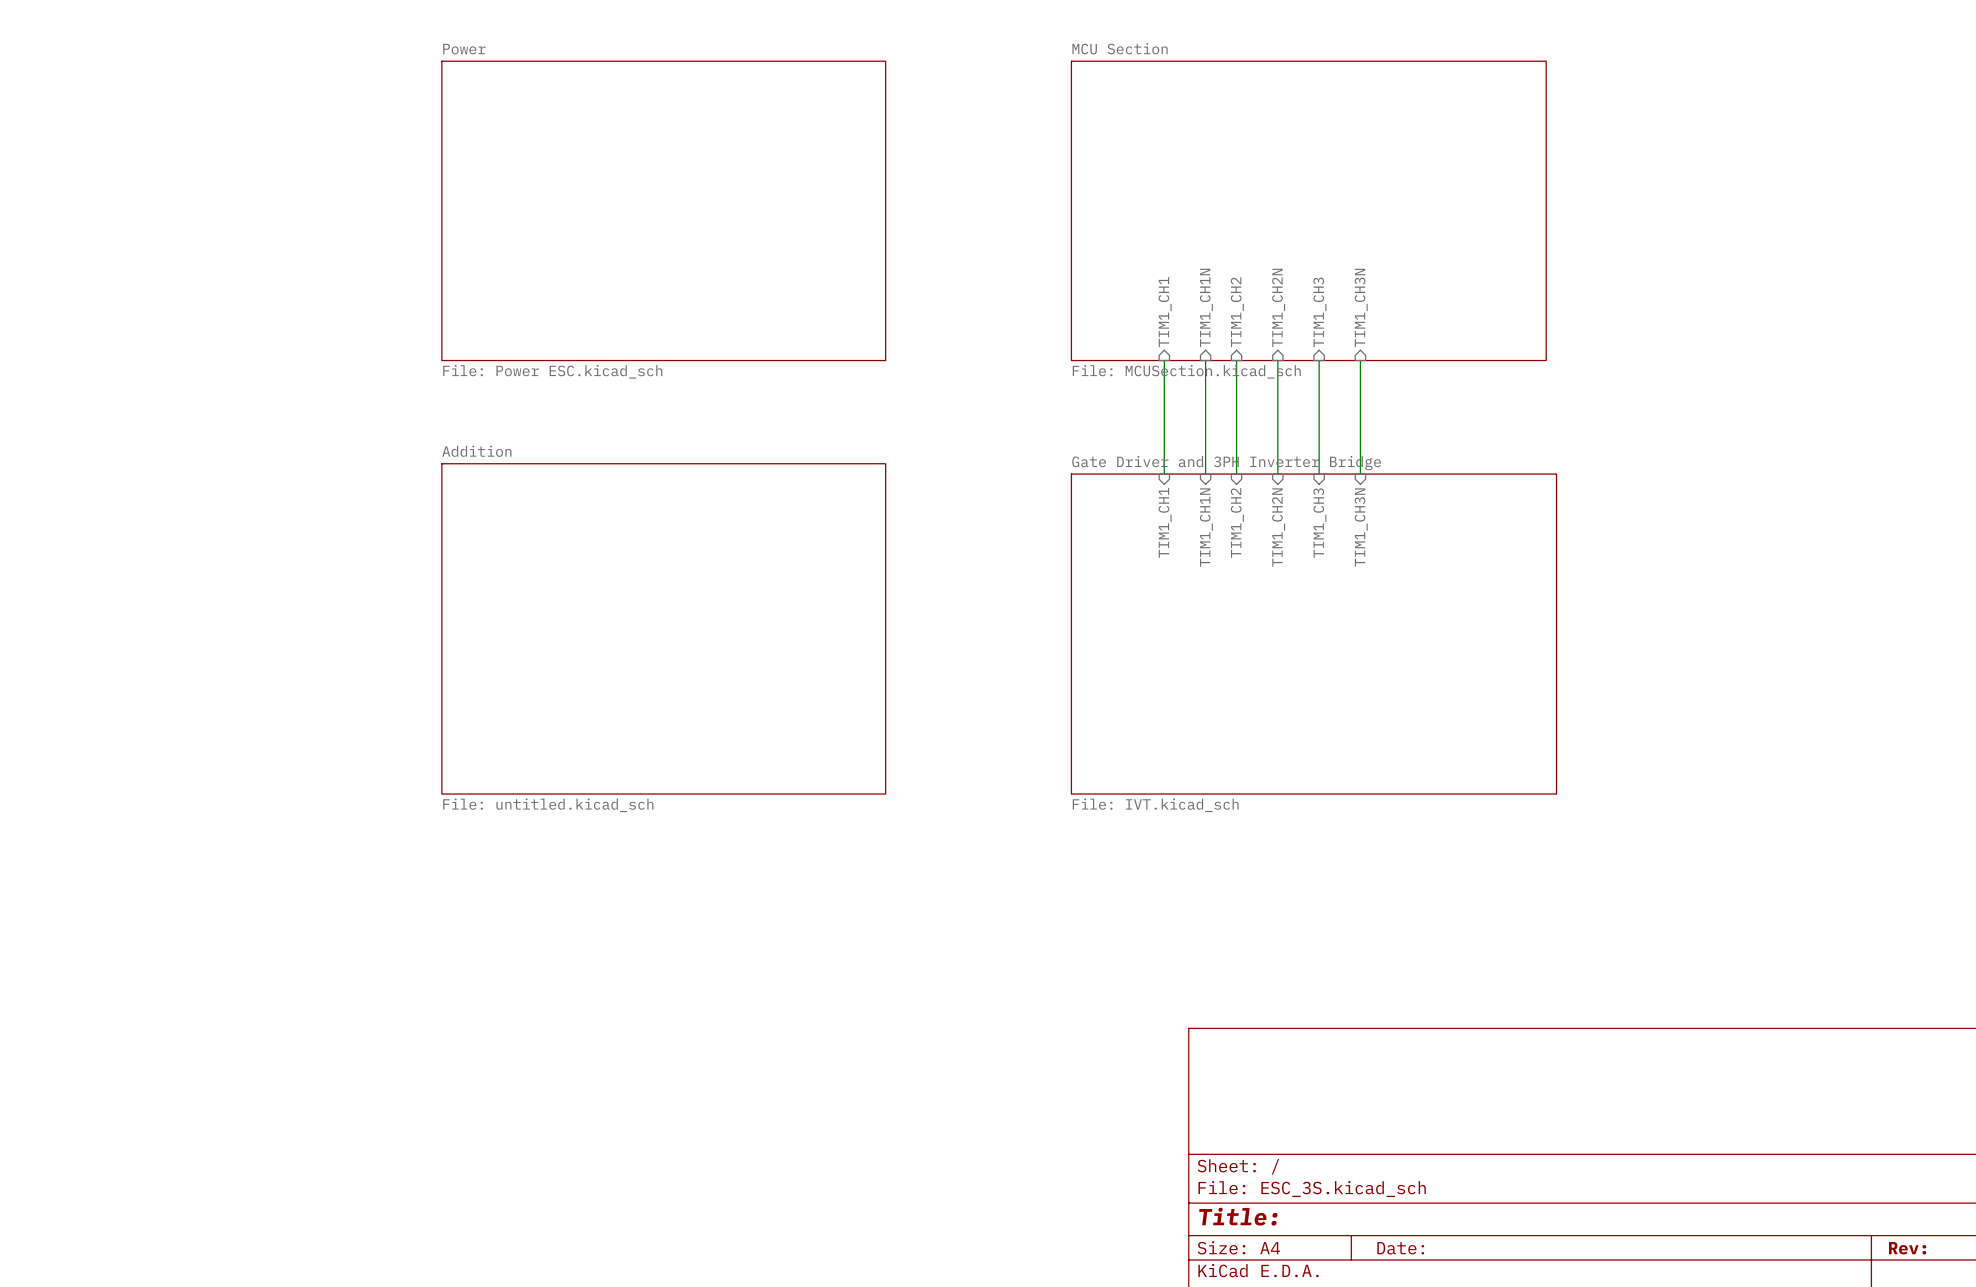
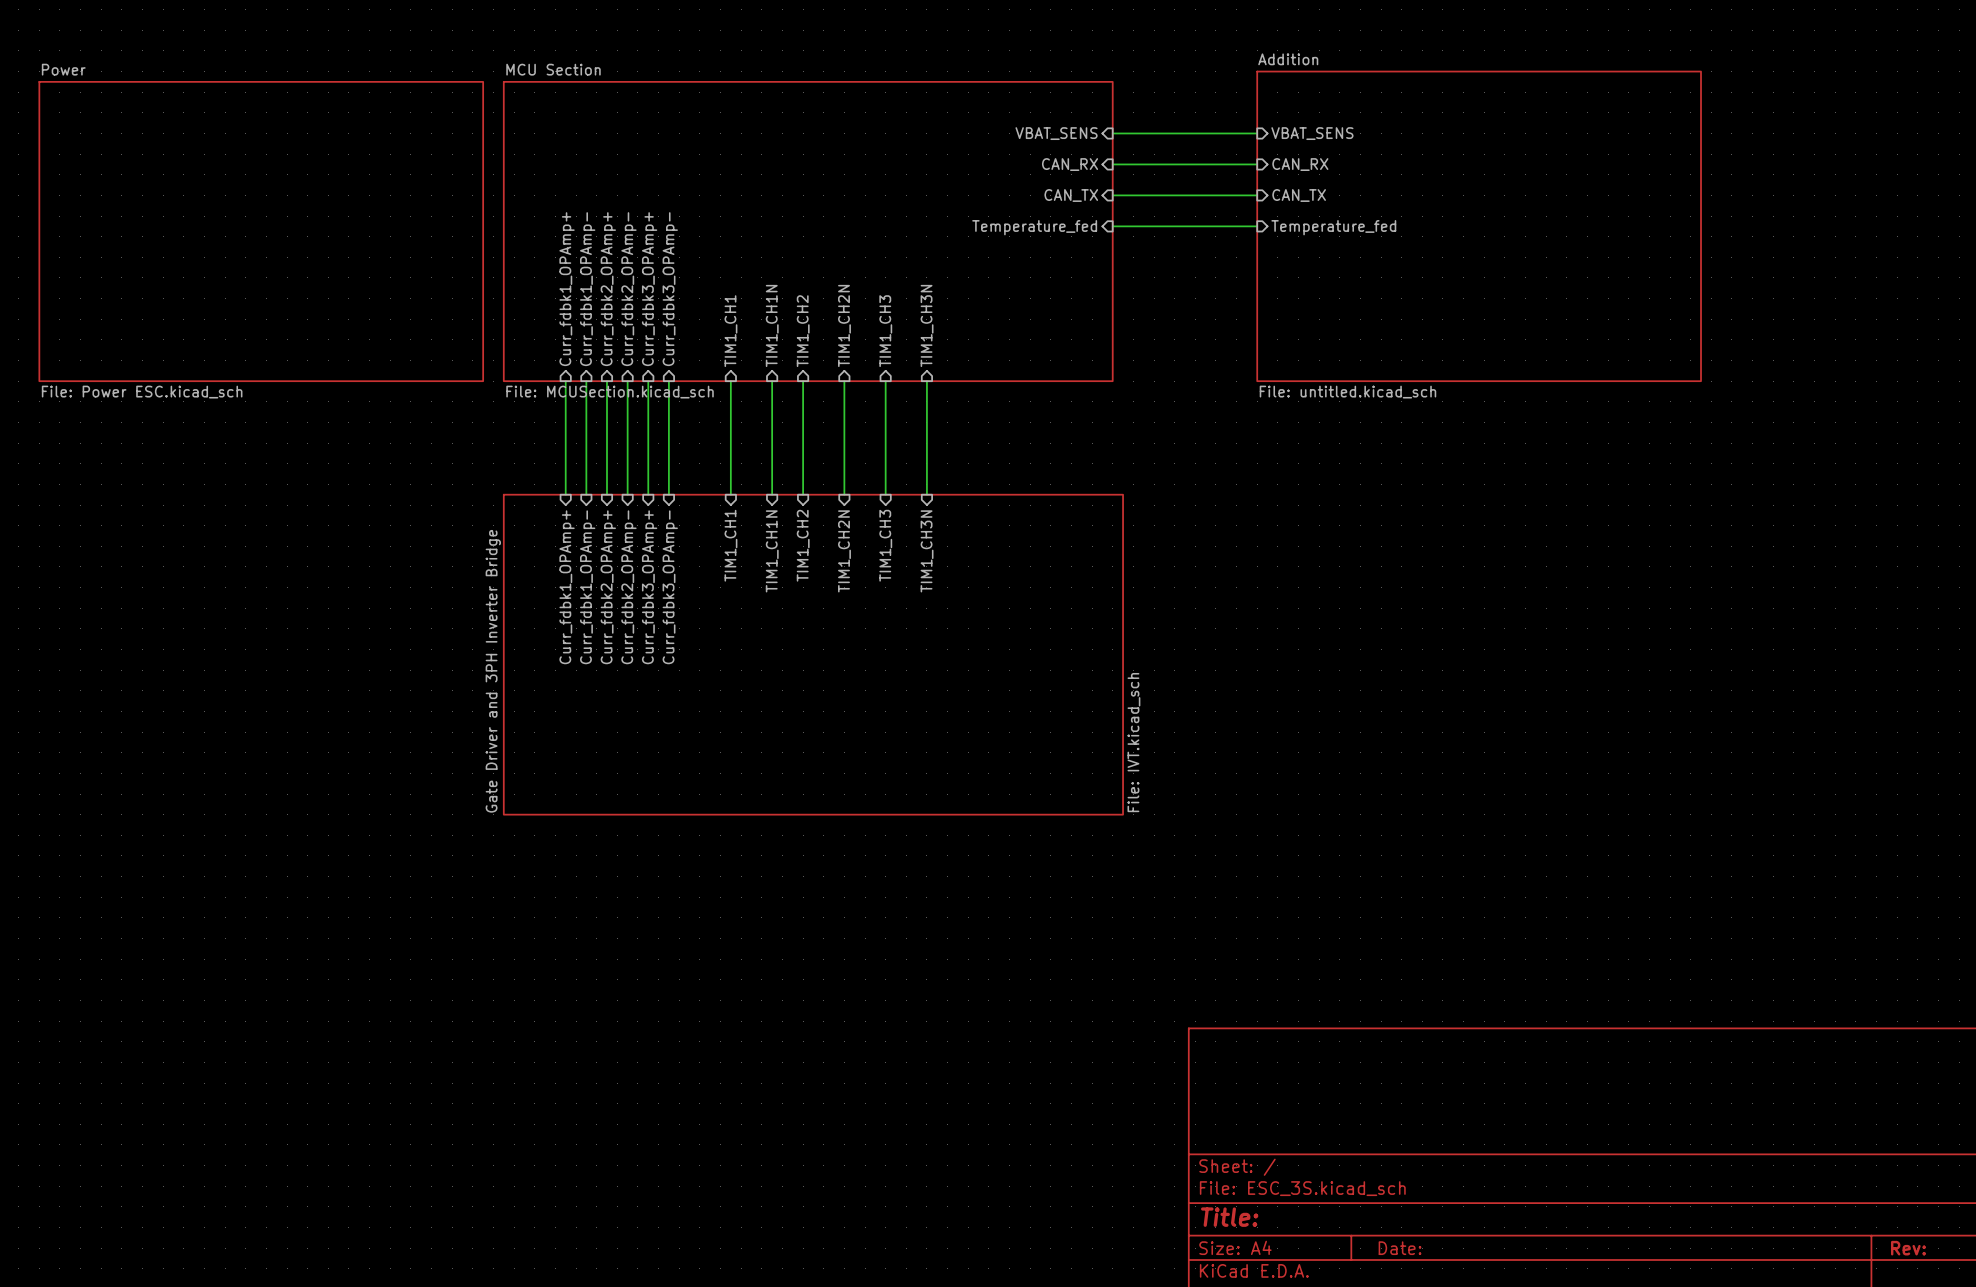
wire: none -> (1112, 133) (1257, 133)
sheet pin: none -> VBAT_SENS (1056, 133)
sheet pin: none -> VBAT_SENS (1312, 133)
wire: none -> (1112, 164) (1257, 164)
sheet pin: none -> CAN_RX (1070, 164)
sheet pin: none -> CAN_RX (1300, 164)
wire: none -> (1112, 195) (1257, 195)
sheet pin: none -> CAN_TX (1071, 195)
sheet pin: none -> CAN_TX (1299, 195)
sheet Power: File: Power ESC.kicad_sch (663, 210) -> none
sheet MCU Section: File: MCUSection.kicad_sch (1308, 210) -> none
wire: none -> (1112, 226) (1257, 226)
sheet Addition: none -> File: untitled.kicad_sch (1479, 226)
sheet pin: none -> Temperature_fed (1034, 227)
sheet pin: none -> Temperature_fed (1333, 227)
sheet Power: none -> File: Power ESC.kicad_sch (261, 231)
sheet MCU Section: none -> File: MCUSection.kicad_sch (808, 231)
sheet pin: none -> Curr_fdbk1_OPAmp+ (567, 289)
sheet pin: none -> Curr_fdbk2_OPAmp+ (608, 289)
sheet pin: none -> Curr_fdbk3_OPAmp+ (649, 289)
sheet pin: none -> Curr_fdbk1_OPAmp- (587, 289)
sheet pin: none -> Curr_fdbk2_OPAmp- (628, 289)
sheet pin: none -> Curr_fdbk3_OPAmp- (670, 289)
sheet pin: TIM1_CH1N (1206, 307) -> none
sheet pin: TIM1_CH2N (1278, 307) -> none
sheet pin: TIM1_CH3N (1361, 307) -> none
sheet pin: TIM1_CH1 (1165, 312) -> none
sheet pin: TIM1_CH2 (1237, 312) -> none
sheet pin: TIM1_CH3 (1319, 312) -> none
sheet pin: none -> TIM1_CH1N (772, 325)
sheet pin: none -> TIM1_CH2N (844, 325)
sheet pin: none -> TIM1_CH3N (927, 325)
sheet pin: none -> TIM1_CH1 (730, 331)
sheet pin: none -> TIM1_CH2 (803, 331)
sheet pin: none -> TIM1_CH3 (885, 331)
wire: (1164, 360) (1164, 474) -> none
wire: (1205, 360) (1205, 474) -> none
wire: (1236, 360) (1236, 474) -> none
wire: (1277, 360) (1277, 474) -> none
wire: (1319, 360) (1319, 474) -> none
wire: (1360, 360) (1360, 474) -> none
wire: none -> (565, 381) (565, 494)
wire: none -> (586, 381) (586, 494)
wire: none -> (606, 381) (606, 494)
wire: none -> (627, 381) (627, 494)
wire: none -> (648, 381) (648, 494)
wire: none -> (668, 381) (668, 494)
wire: none -> (730, 381) (730, 494)
wire: none -> (772, 381) (772, 494)
wire: none -> (803, 381) (803, 494)
wire: none -> (844, 381) (844, 494)
wire: none -> (885, 381) (885, 494)
wire: none -> (926, 381) (926, 494)
sheet Gate Driver and 3PH Inverter Bridge name position: Gate Driver and 3PH Inverter Bridge (1226, 463) -> Gate Driver and 3PH Inverter Bridge (493, 671)
sheet Gate Driver and 3PH Inverter Bridge shape: [1070, 473, 1558, 795] -> [503, 494, 1124, 816]
sheet pin: TIM1_CH1 (1165, 522) -> none
sheet pin: TIM1_CH2 (1237, 522) -> none
sheet pin: TIM1_CH3 (1319, 523) -> none
sheet pin: TIM1_CH1N (1206, 527) -> none
sheet pin: TIM1_CH2N (1278, 527) -> none
sheet pin: TIM1_CH3N (1361, 527) -> none
sheet pin: none -> TIM1_CH1 (730, 545)
sheet pin: none -> TIM1_CH2 (803, 545)
sheet pin: none -> TIM1_CH3 (885, 545)
sheet pin: none -> TIM1_CH1N (772, 551)
sheet pin: none -> TIM1_CH2N (844, 551)
sheet pin: none -> TIM1_CH3N (927, 551)
sheet pin: none -> Curr_fdbk1_OPAmp+ (567, 587)
sheet pin: none -> Curr_fdbk1_OPAmp- (587, 587)
sheet pin: none -> Curr_fdbk2_OPAmp+ (608, 587)
sheet pin: none -> Curr_fdbk2_OPAmp- (628, 587)
sheet pin: none -> Curr_fdbk3_OPAmp+ (649, 587)
sheet pin: none -> Curr_fdbk3_OPAmp- (670, 587)
sheet Addition: File: untitled.kicad_sch (663, 628) -> none
sheet Gate Driver and 3PH Inverter Bridge value position: File: IVT.kicad_sch (1155, 805) -> File: IVT.kicad_sch (1133, 742)

